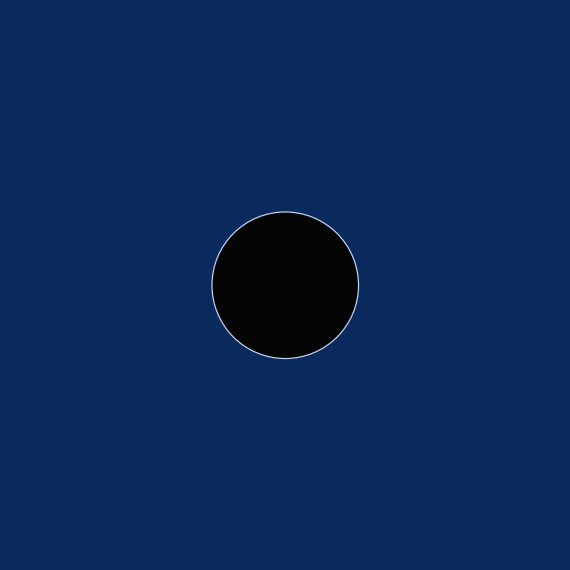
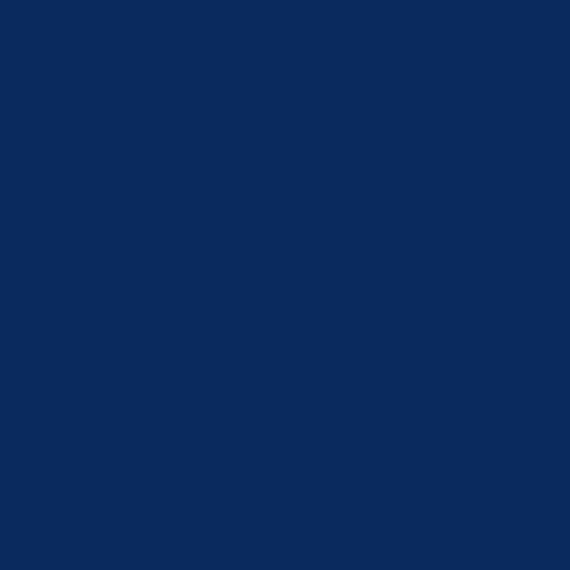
part: (285, 285) -> none

